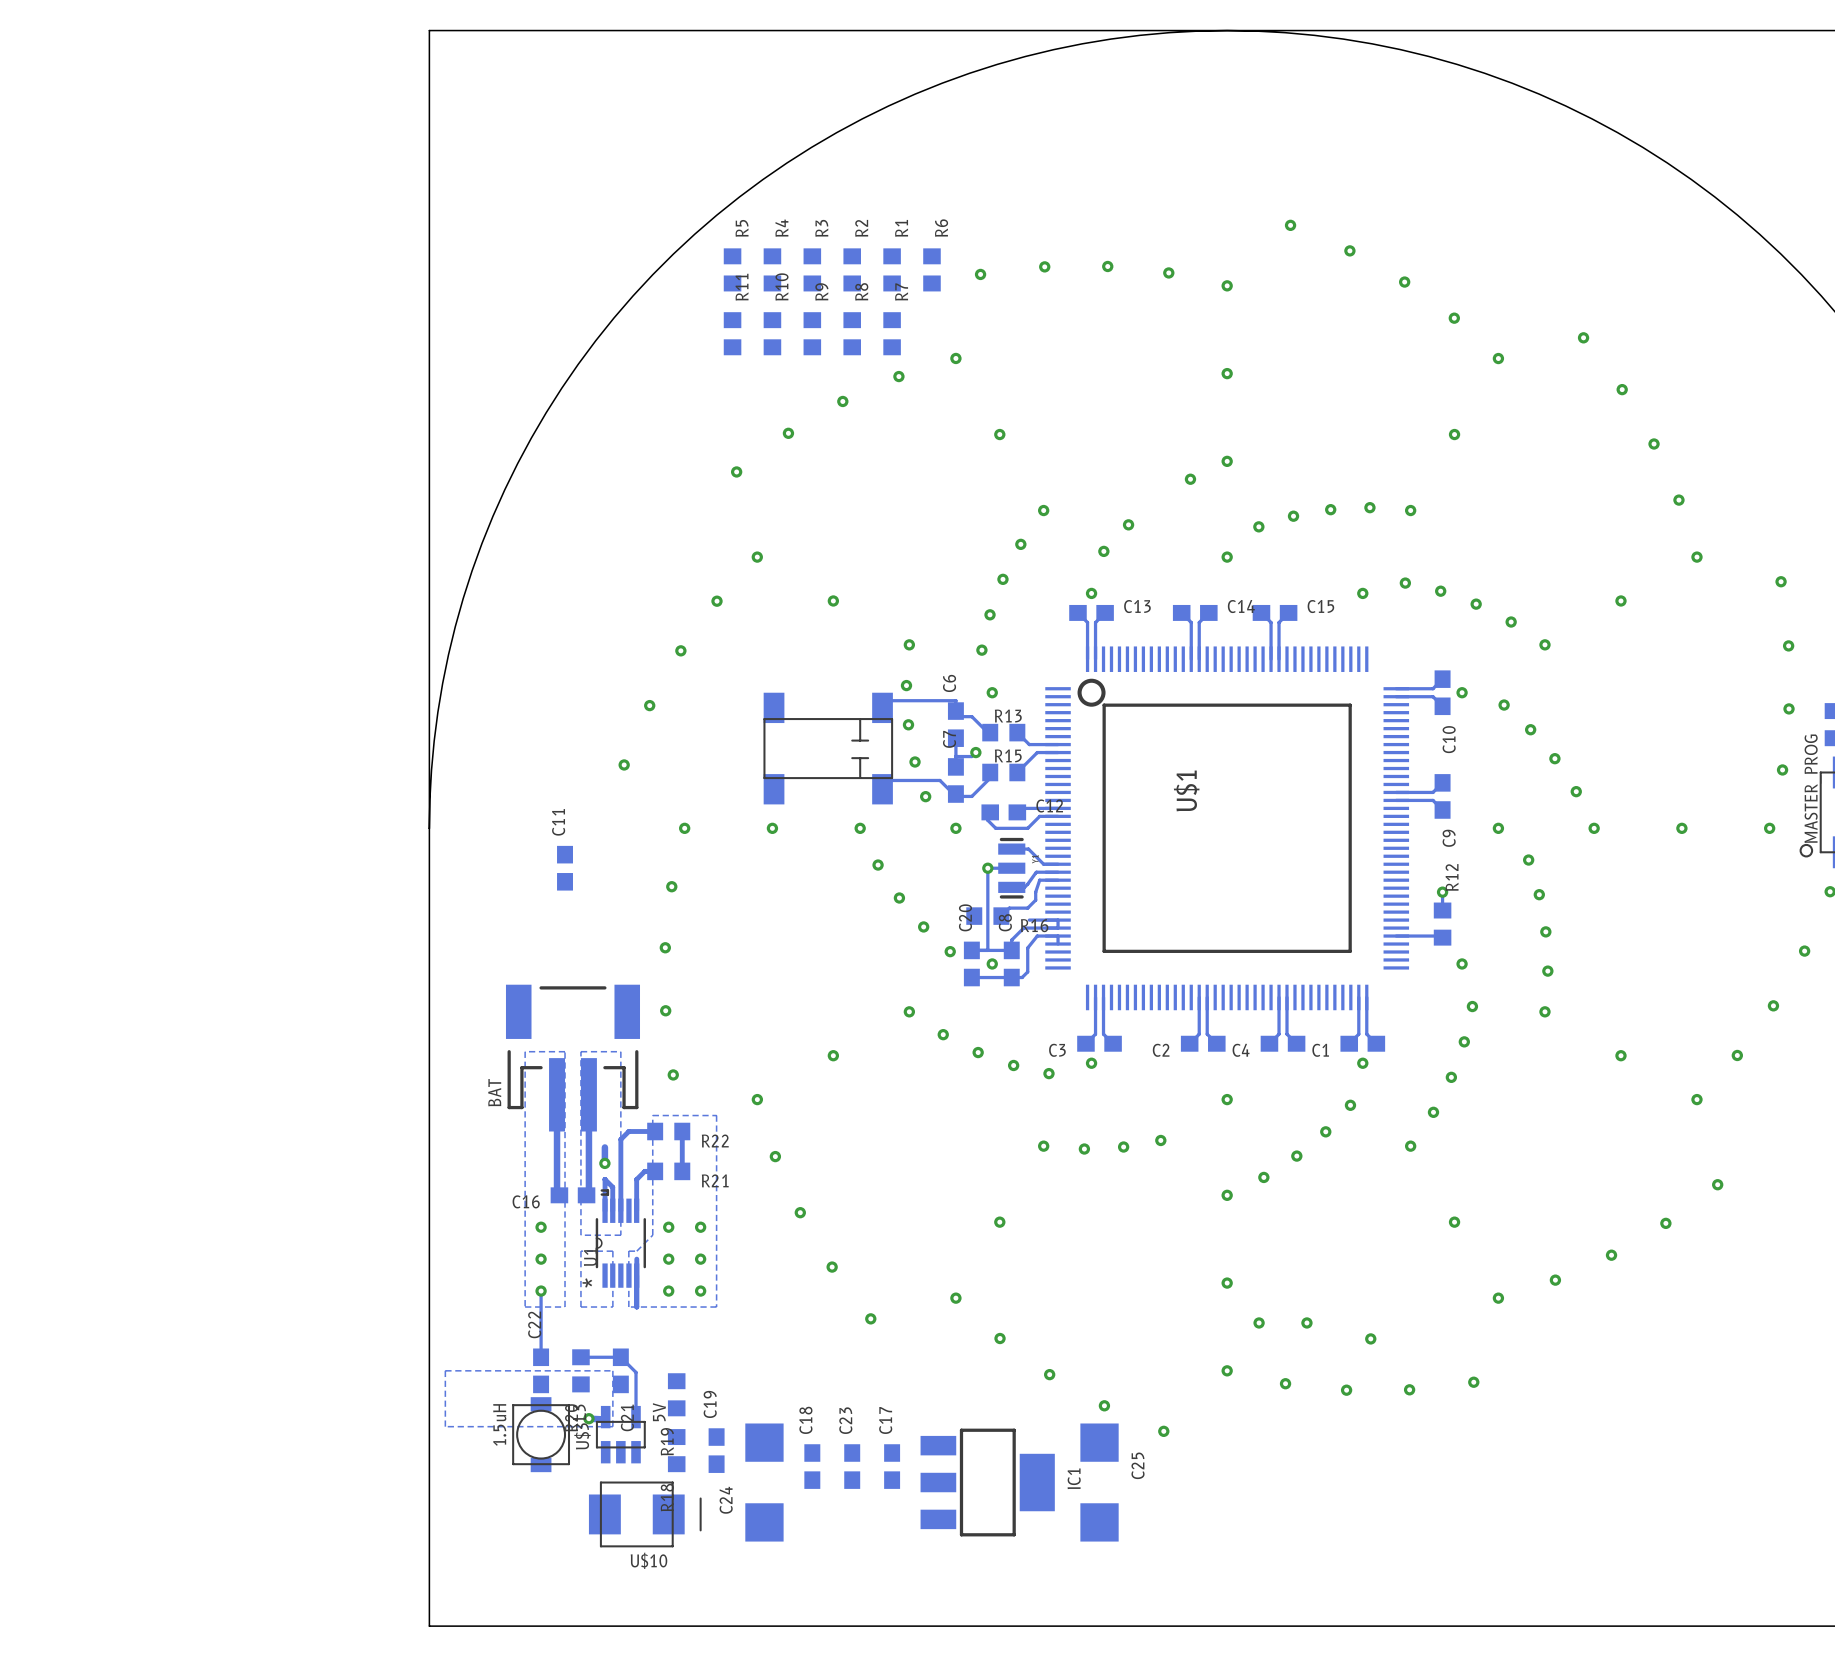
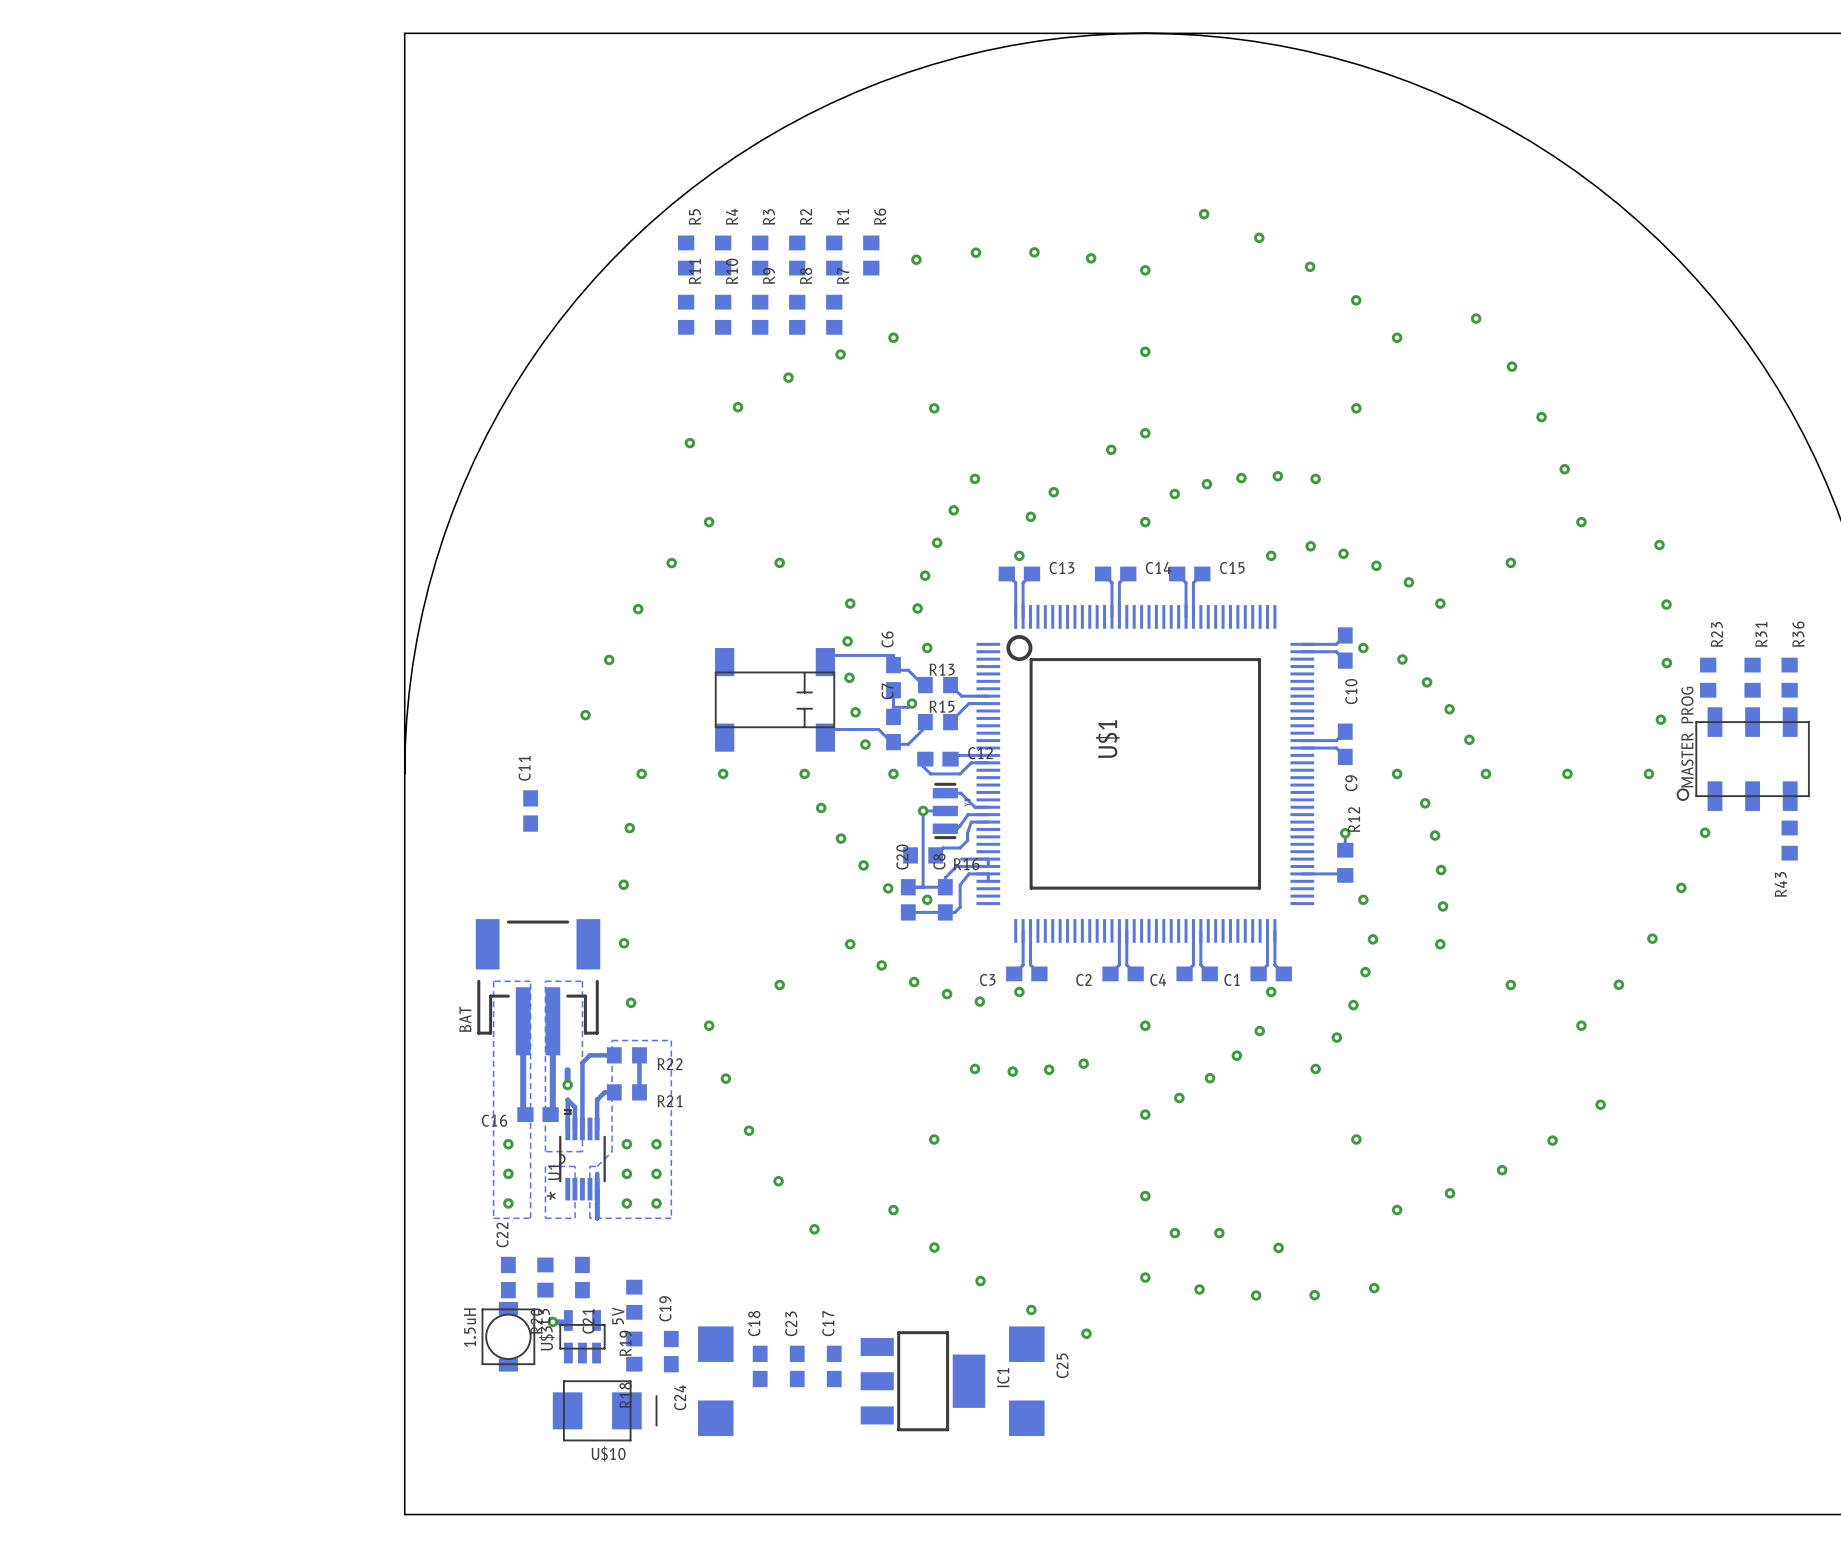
track: (541, 1291) (541, 1357) -> none
track: (580, 1357) (620, 1357) (636, 1372) (636, 1417) -> none
zone outline: (612, 1370) (445, 1370) (445, 1426) (612, 1426) (612, 1370) -> none

